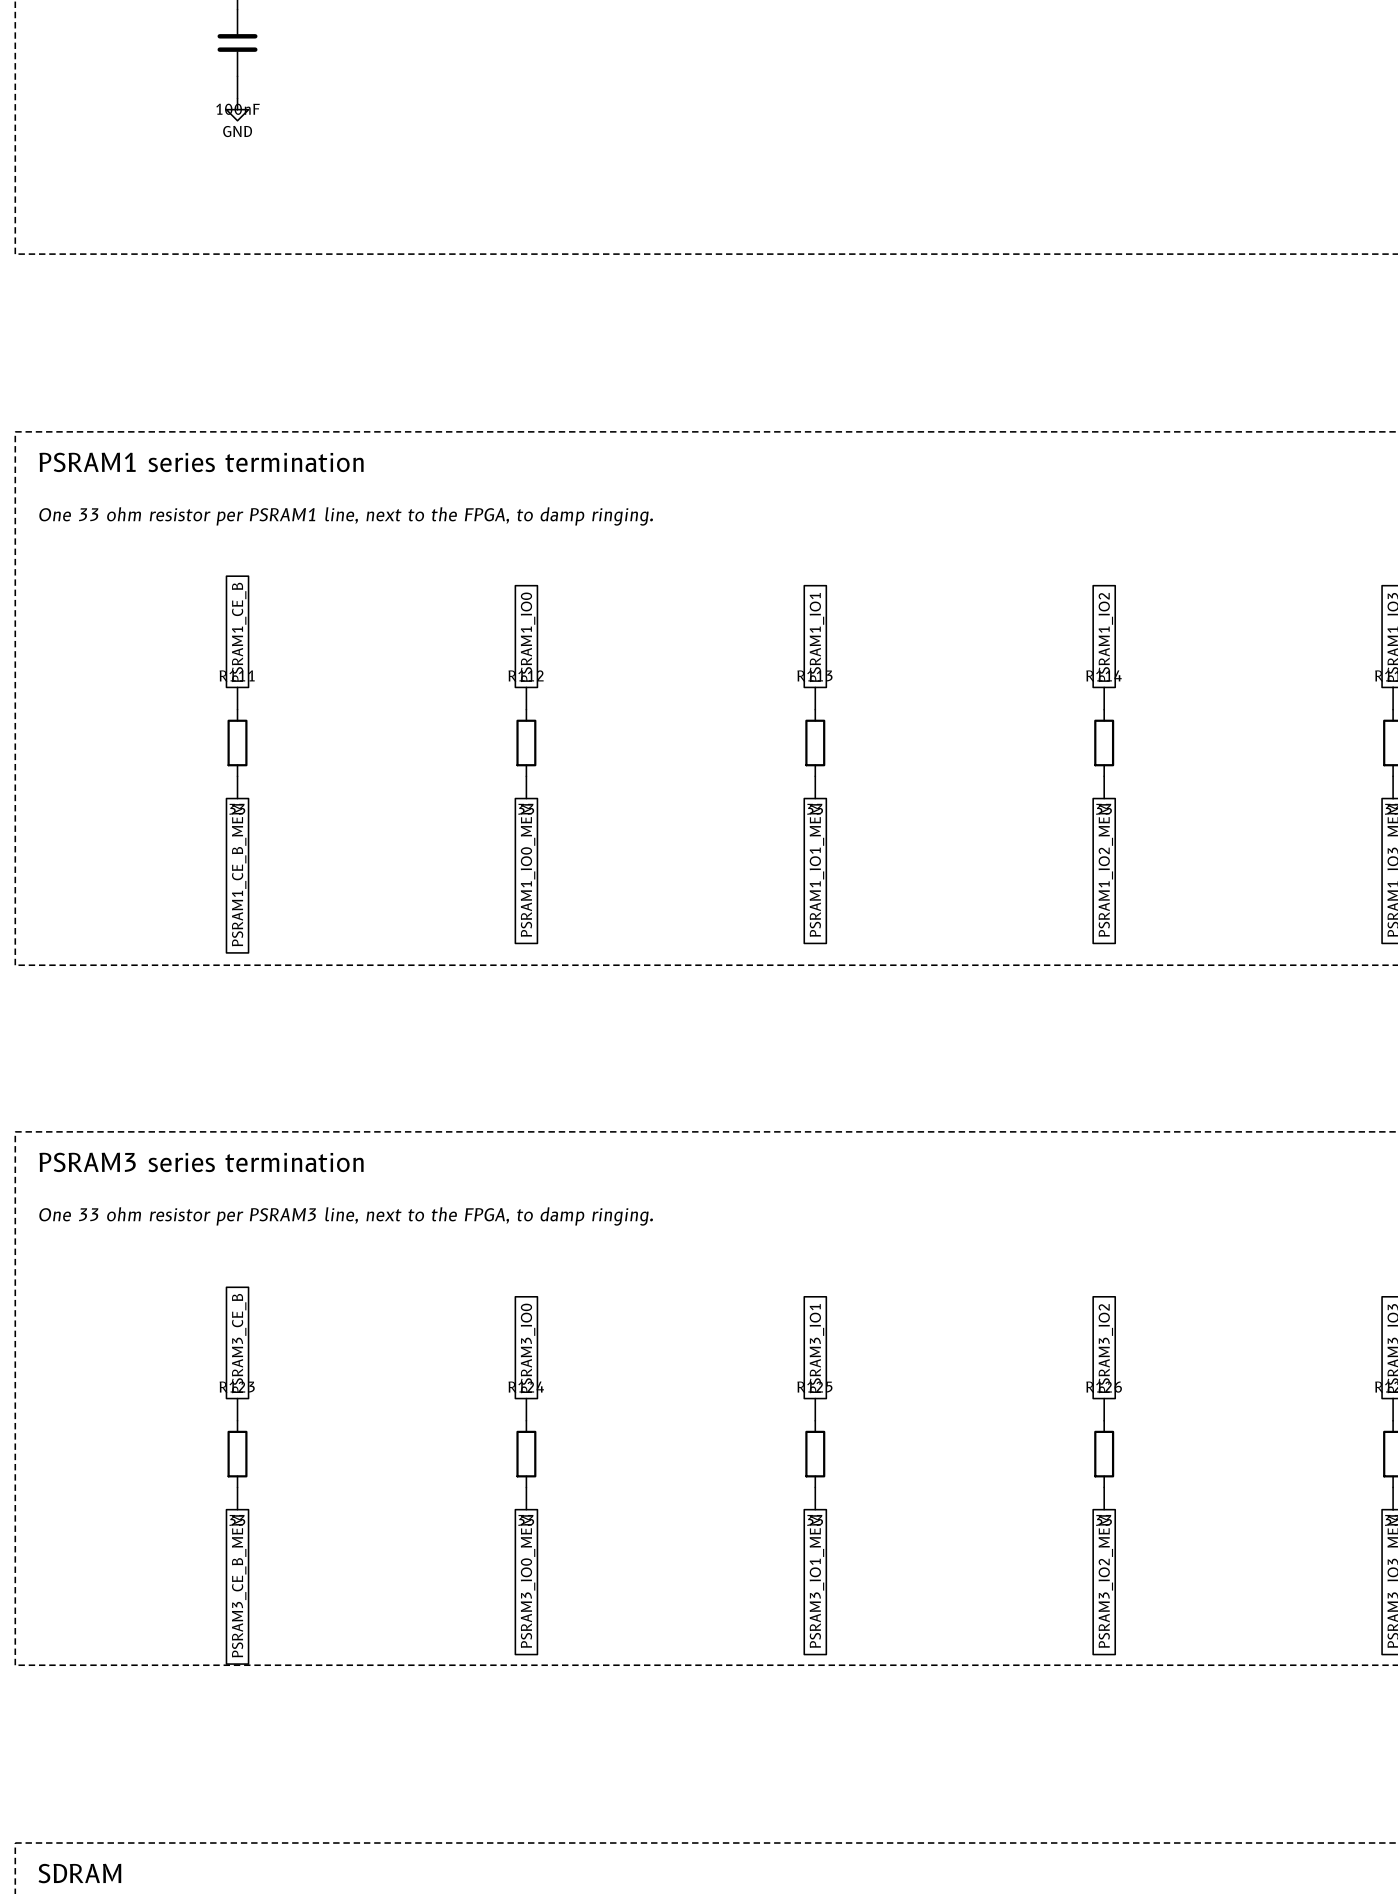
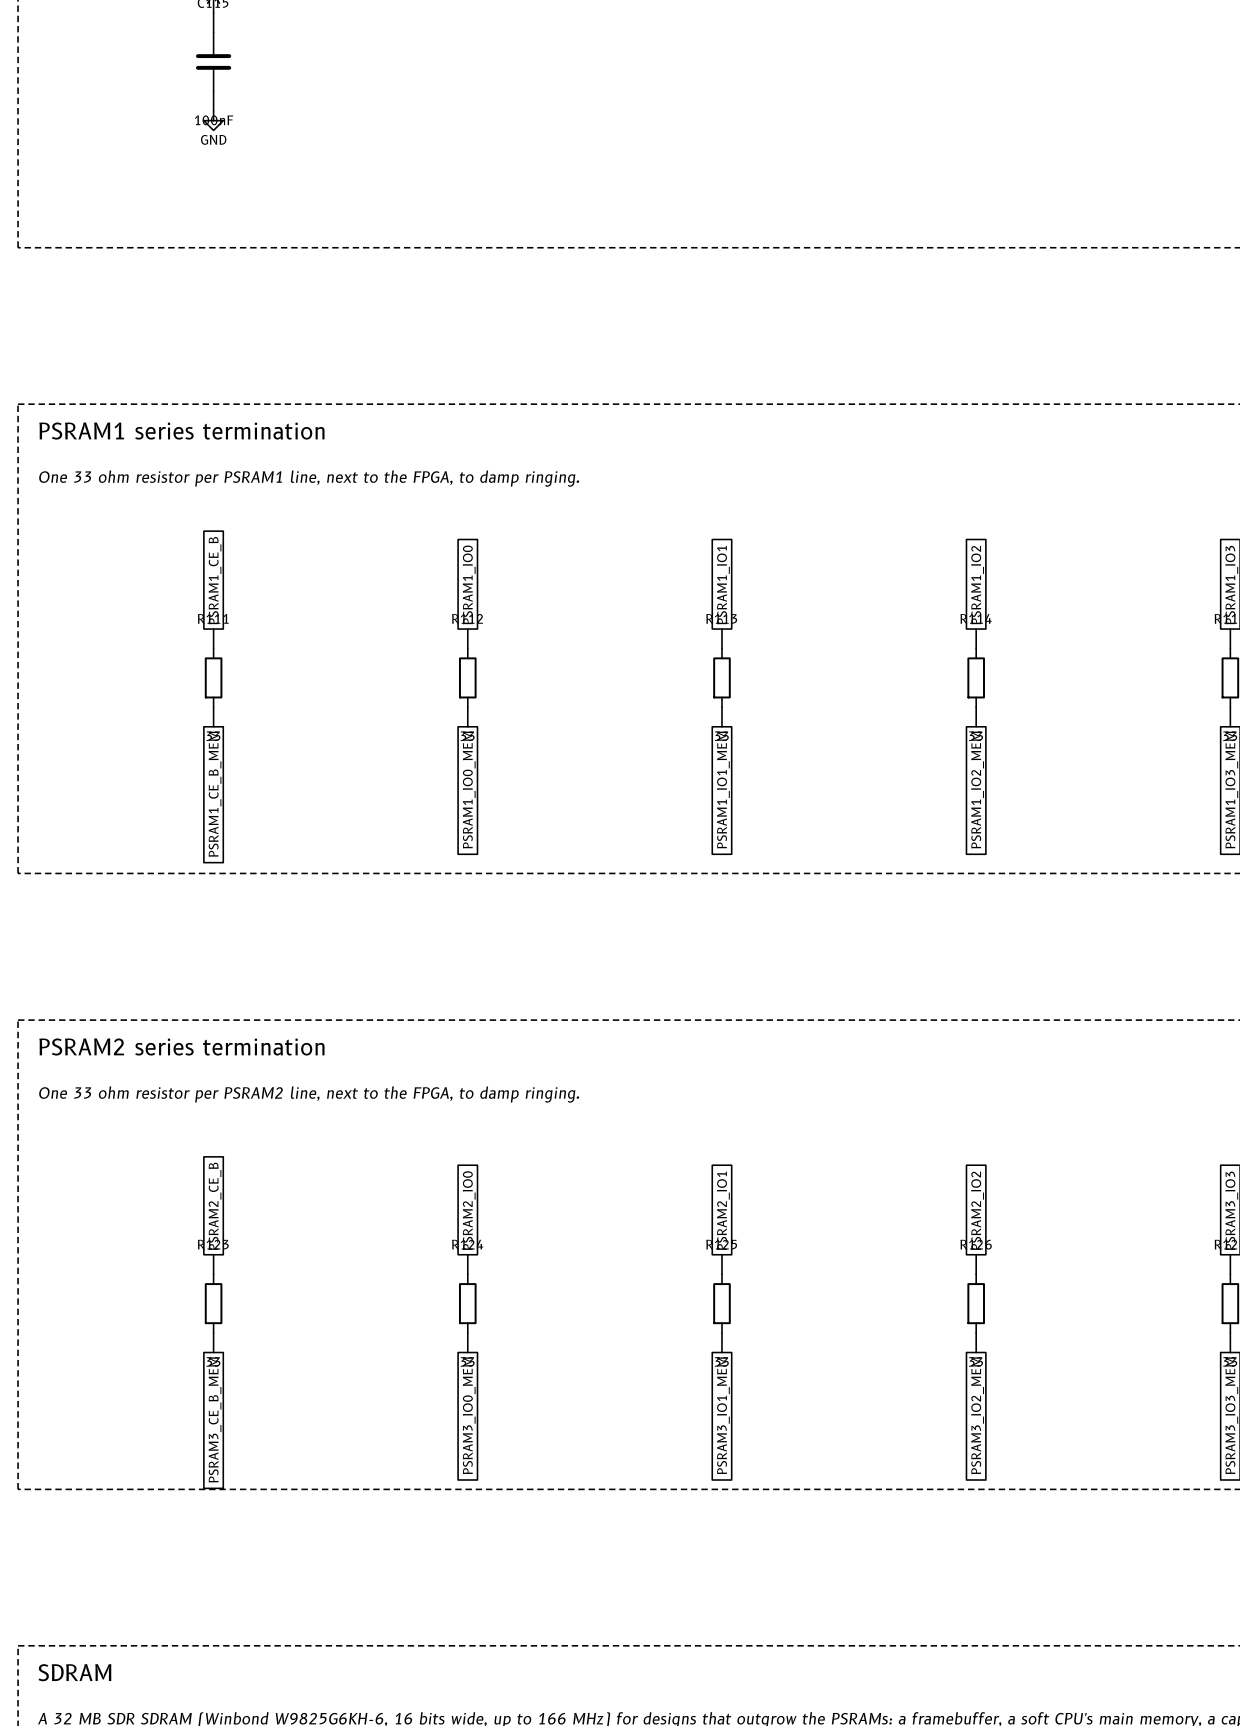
text: PSRAM3 series termination (201, 1162) -> PSRAM2 series termination (181, 1046)
text: One 33 ohm resistor per PSRAM3 line, next to the FPGA, to damp ringing. (346, 1216) -> One 33 ohm resistor per PSRAM2 line, next to the FPGA, to damp ringing. (309, 1094)
global label: PSRAM3_CE_B (239, 1343) -> PSRAM2_CE_B (215, 1206)
global label: PSRAM3_IO0 (528, 1348) -> PSRAM2_IO0 (469, 1210)
global label: PSRAM3_IO1 (816, 1348) -> PSRAM2_IO1 (723, 1210)
global label: PSRAM3_IO2 (1105, 1348) -> PSRAM2_IO2 (977, 1210)

